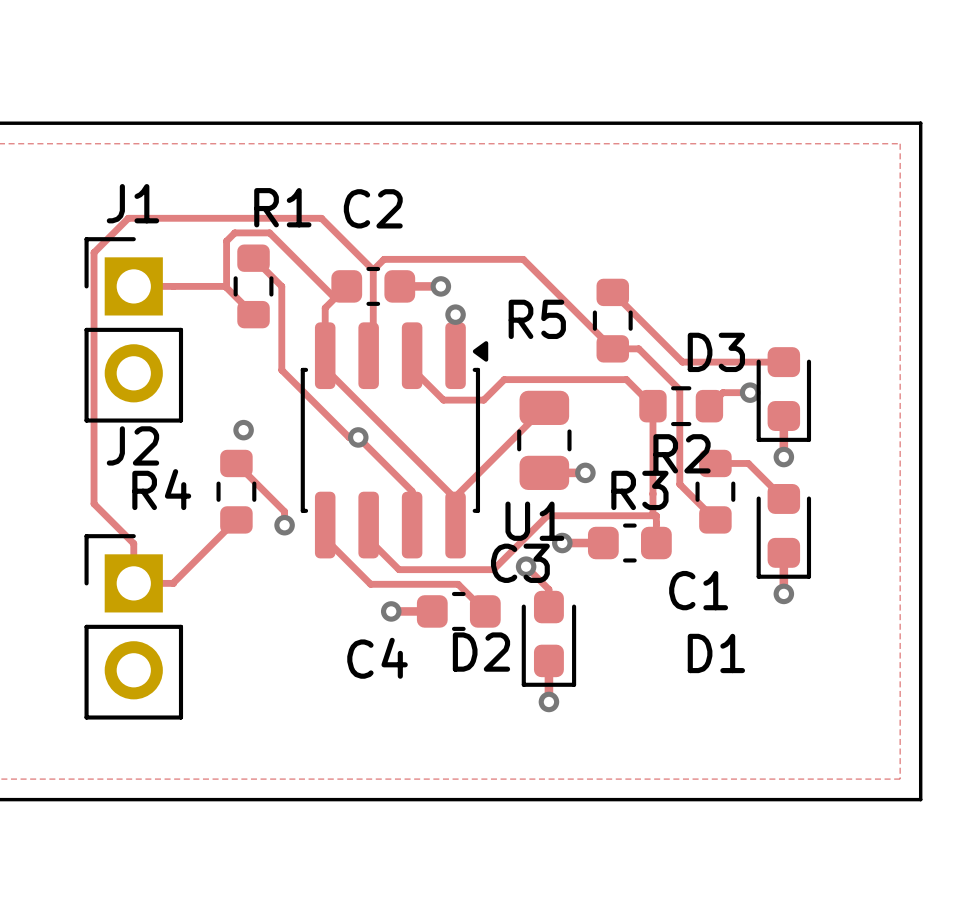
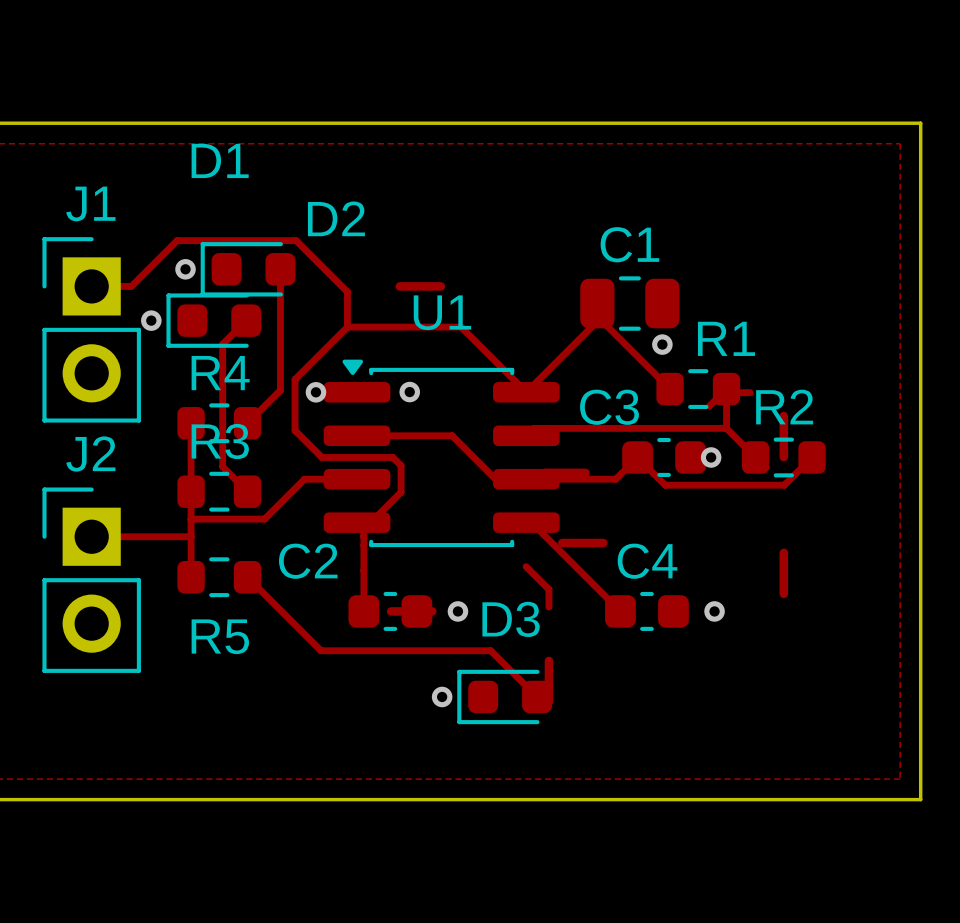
C2 name position: C2 (373, 208) -> C2 (308, 561)
track: (253, 258) (281, 286) (281, 370) (349, 437) (358, 437) (412, 491) (412, 525) -> none
via: none -> (185, 269)
track: none -> (280, 269) (280, 390) (247, 423)
track: (373, 270) (373, 351) (368, 355) -> none
track: (373, 270) (384, 259) (523, 259) (612, 348) (638, 348) (679, 389) (679, 484) (715, 519) -> none
track: (373, 270) (321, 218) (128, 218) (94, 252) (94, 503) (133, 543) (133, 583) (173, 583) -> none
track: none -> (91, 286) (131, 286) (177, 240) (296, 240) (347, 291) (347, 327)
track: (133, 286) (226, 286) -> none
R1 rotation: 0° (253, 286) -> 90° clockwise (698, 389)
R1 position: (253, 286) -> (698, 389)
track: (346, 286) (325, 307) (325, 368) (453, 496) (455, 496) -> none
C2 position: (373, 286) -> (390, 611)
via: (440, 286) -> none
track: (612, 292) (682, 362) (783, 362) -> none
track: (334, 298) (269, 232) (234, 232) (226, 241) (226, 287) (253, 314) -> none
via: (455, 314) -> none
R5 name position: R5 (537, 319) -> R5 (220, 636)
via: none -> (151, 320)
track: none -> (246, 320) (222, 344) (222, 466) (247, 491)
R5 rotation: 0° (612, 320) -> 90° clockwise (219, 577)
R5 position: (612, 320) -> (219, 577)
track: none -> (597, 321) (602, 321) (670, 389)
track: none -> (597, 321) (526, 392) (461, 327) (347, 327)
track: none -> (347, 327) (295, 379) (295, 430) (322, 457) (392, 457) (401, 465) (401, 492) (363, 529)
J1 position: (133, 329) -> (91, 329)
via: none -> (662, 344)
track: (412, 355) (412, 368) (443, 400) (483, 400) (504, 379) (626, 379) (652, 406) (652, 515) -> none
track: none -> (726, 389) (726, 428)
via: none -> (315, 392)
via: none -> (409, 392)
via: (750, 392) -> none
D3 rotation: 0° (783, 394) -> 90° clockwise (504, 696)
D3 position: (783, 394) -> (504, 696)
R2 position: (681, 406) -> (783, 457)
track: (544, 407) (455, 496) -> none
track: none -> (191, 423) (191, 577)
track: none -> (726, 428) (533, 428) (526, 435)
track: none -> (726, 428) (755, 457)
via: (243, 430) -> none
track: none -> (357, 435) (452, 435) (495, 479) (615, 479) (637, 457) (665, 485) (784, 485) (812, 457)
via: (358, 437) -> none
U1 rotation: 0° (394, 440) -> 90° counterclockwise (441, 453)
C1 rotation: 0° (544, 440) -> 90° clockwise (629, 303)
C1 position: (544, 440) -> (629, 303)
J2 name position: J2 (132, 445) -> J2 (90, 454)
R2 name position: R2 (682, 453) -> R2 (784, 407)
via: none -> (711, 457)
via: (783, 457) -> none
track: (236, 463) (284, 511) (284, 525) -> none
track: (715, 463) (748, 463) (783, 498) -> none
via: (585, 472) -> none
track: none -> (357, 479) (304, 479) (264, 519) (191, 519)
R4 rotation: 0° (236, 491) -> 90° clockwise (219, 423)
R4 position: (236, 491) -> (219, 423)
R3 rotation: 0° (715, 491) -> 90° clockwise (219, 491)
R3 position: (715, 491) -> (219, 491)
track: (236, 519) (173, 582) -> none
U1 name position: U1 (534, 521) -> U1 (442, 312)
track: none -> (526, 522) (531, 522) (620, 611)
via: (284, 525) -> none
track: (325, 525) (325, 538) (370, 584) (458, 584) (485, 611) -> none
track: (368, 525) (368, 539) (399, 569) (493, 569) (547, 515) (656, 515) (656, 543) -> none
track: none -> (363, 529) (363, 611)
D1 rotation: 0° (783, 531) -> 90° clockwise (213, 320)
D1 position: (783, 531) -> (213, 320)
track: none -> (91, 536) (191, 536)
via: (562, 543) -> none
C3 position: (629, 543) -> (664, 457)
C3 name position: C3 (520, 563) -> C3 (609, 407)
via: (526, 566) -> none
track: none -> (247, 577) (321, 650) (490, 650) (537, 696)
D2 footprint: [521, 590, 577, 687] -> [200, 242, 296, 297]
C1 name position: C1 (698, 590) -> C1 (629, 244)
via position: (783, 593) -> (714, 611)
via: (391, 611) -> none
via: none -> (457, 611)
C4 position: (458, 611) -> (646, 611)
J2 position: (133, 626) -> (91, 580)
D2 name position: D2 (481, 652) -> D2 (336, 218)
D1 name position: D1 (716, 653) -> D1 (220, 160)
C4 name position: C4 (377, 658) -> C4 (647, 561)
via: none -> (442, 696)
via: (548, 701) -> none

